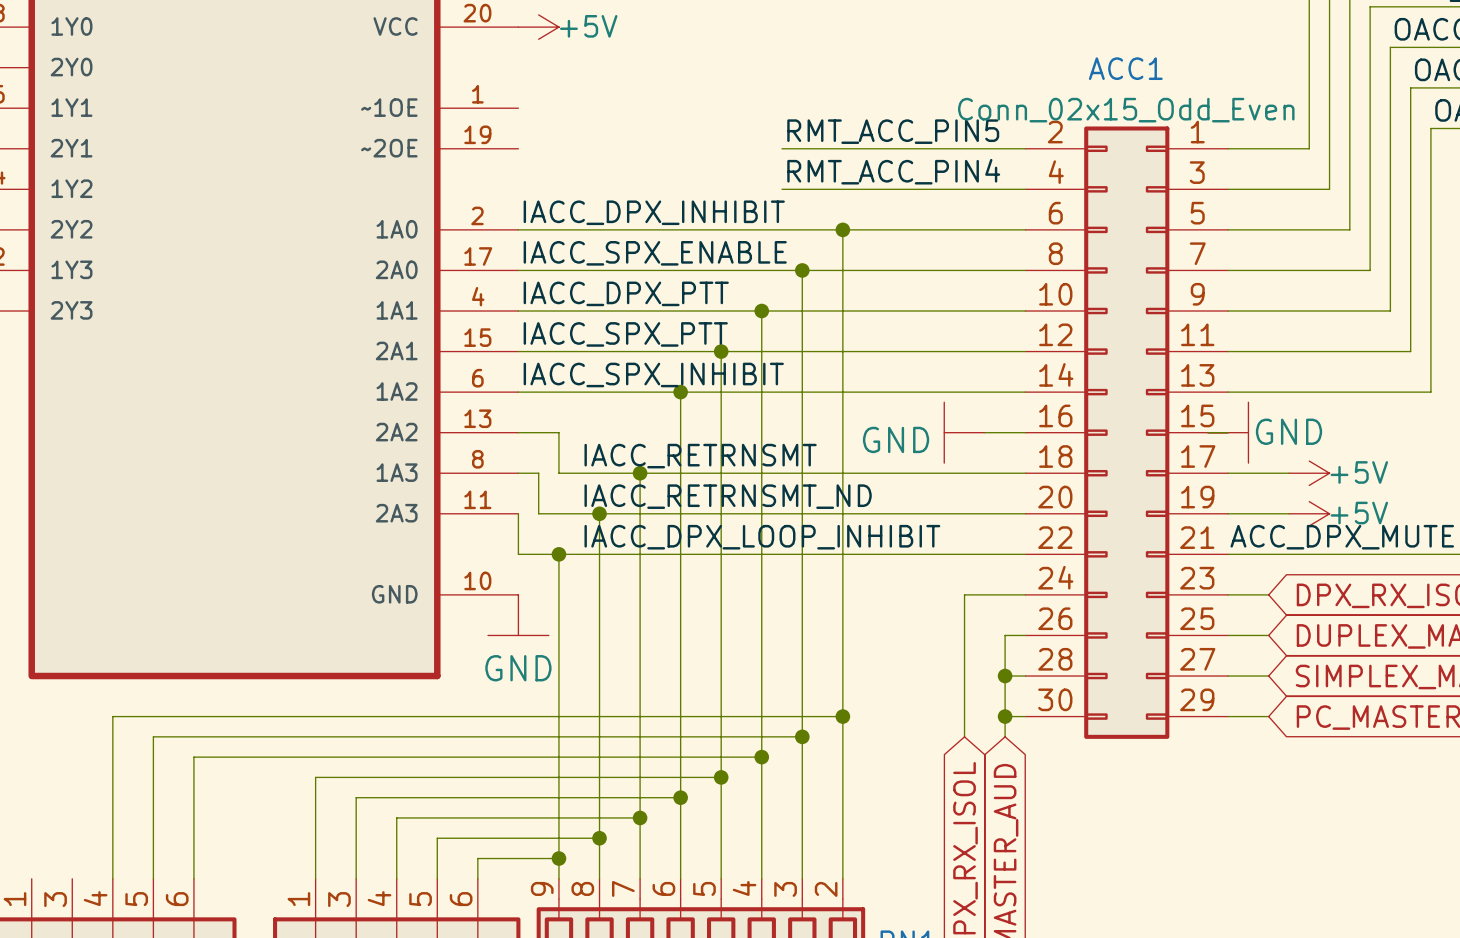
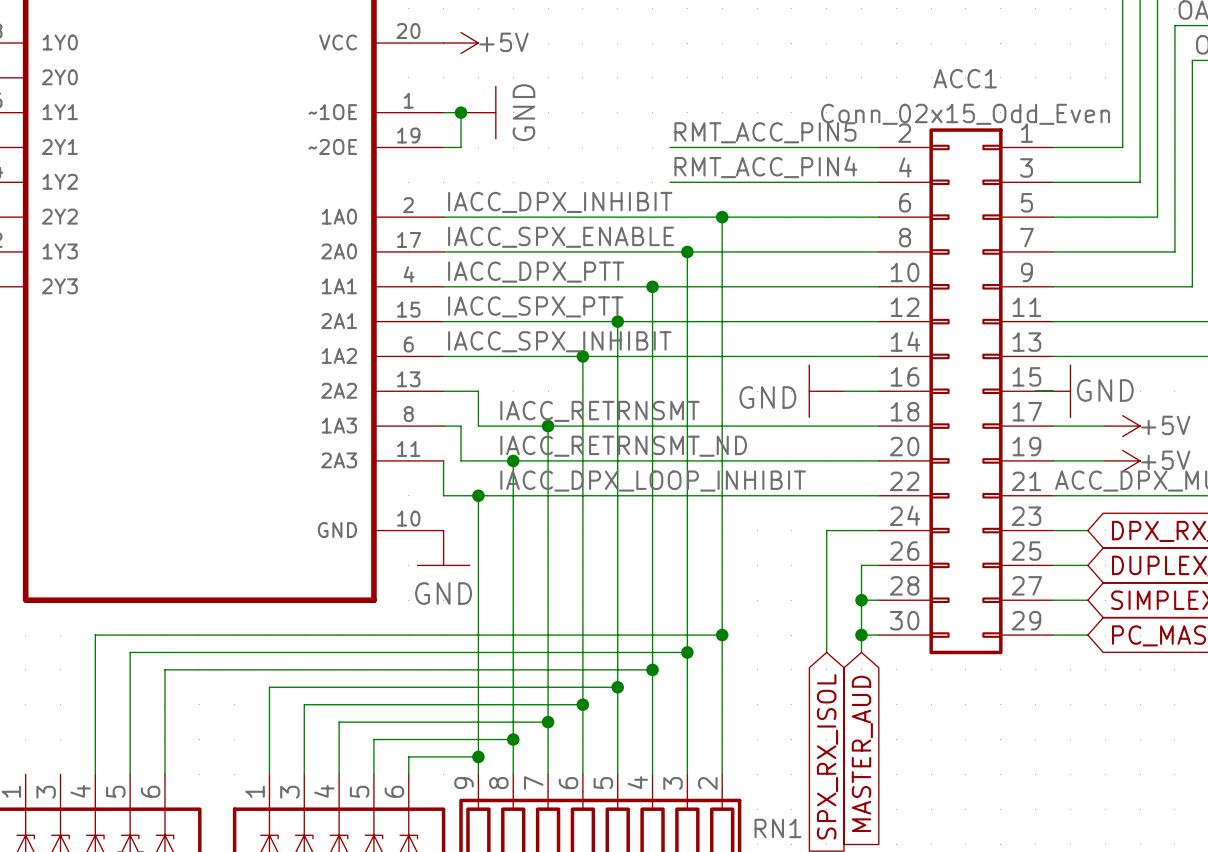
wire: none -> (443, 112) (461, 112) (461, 147) (443, 147)
junction: none -> (461, 112)
power symbol: none -> GND (478, 112)

